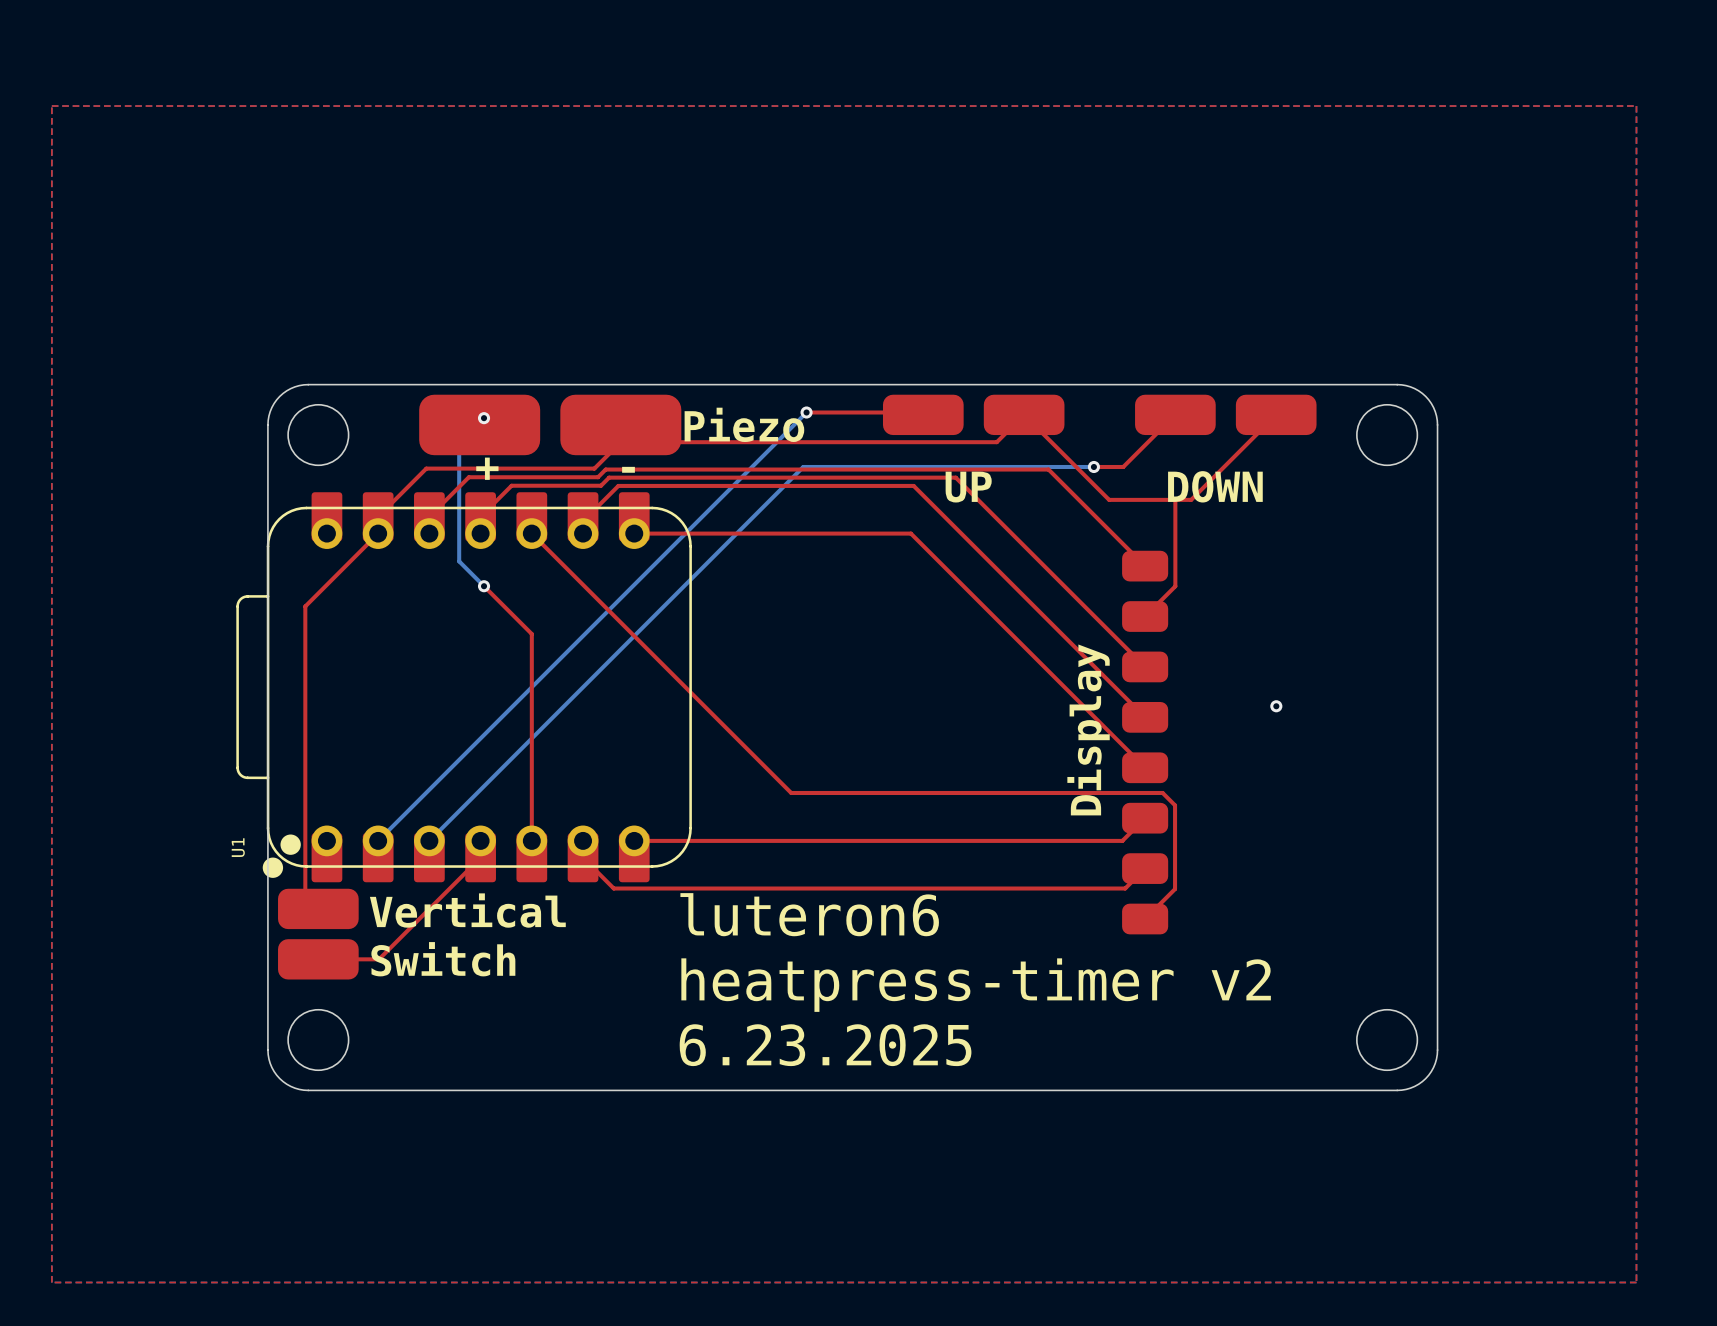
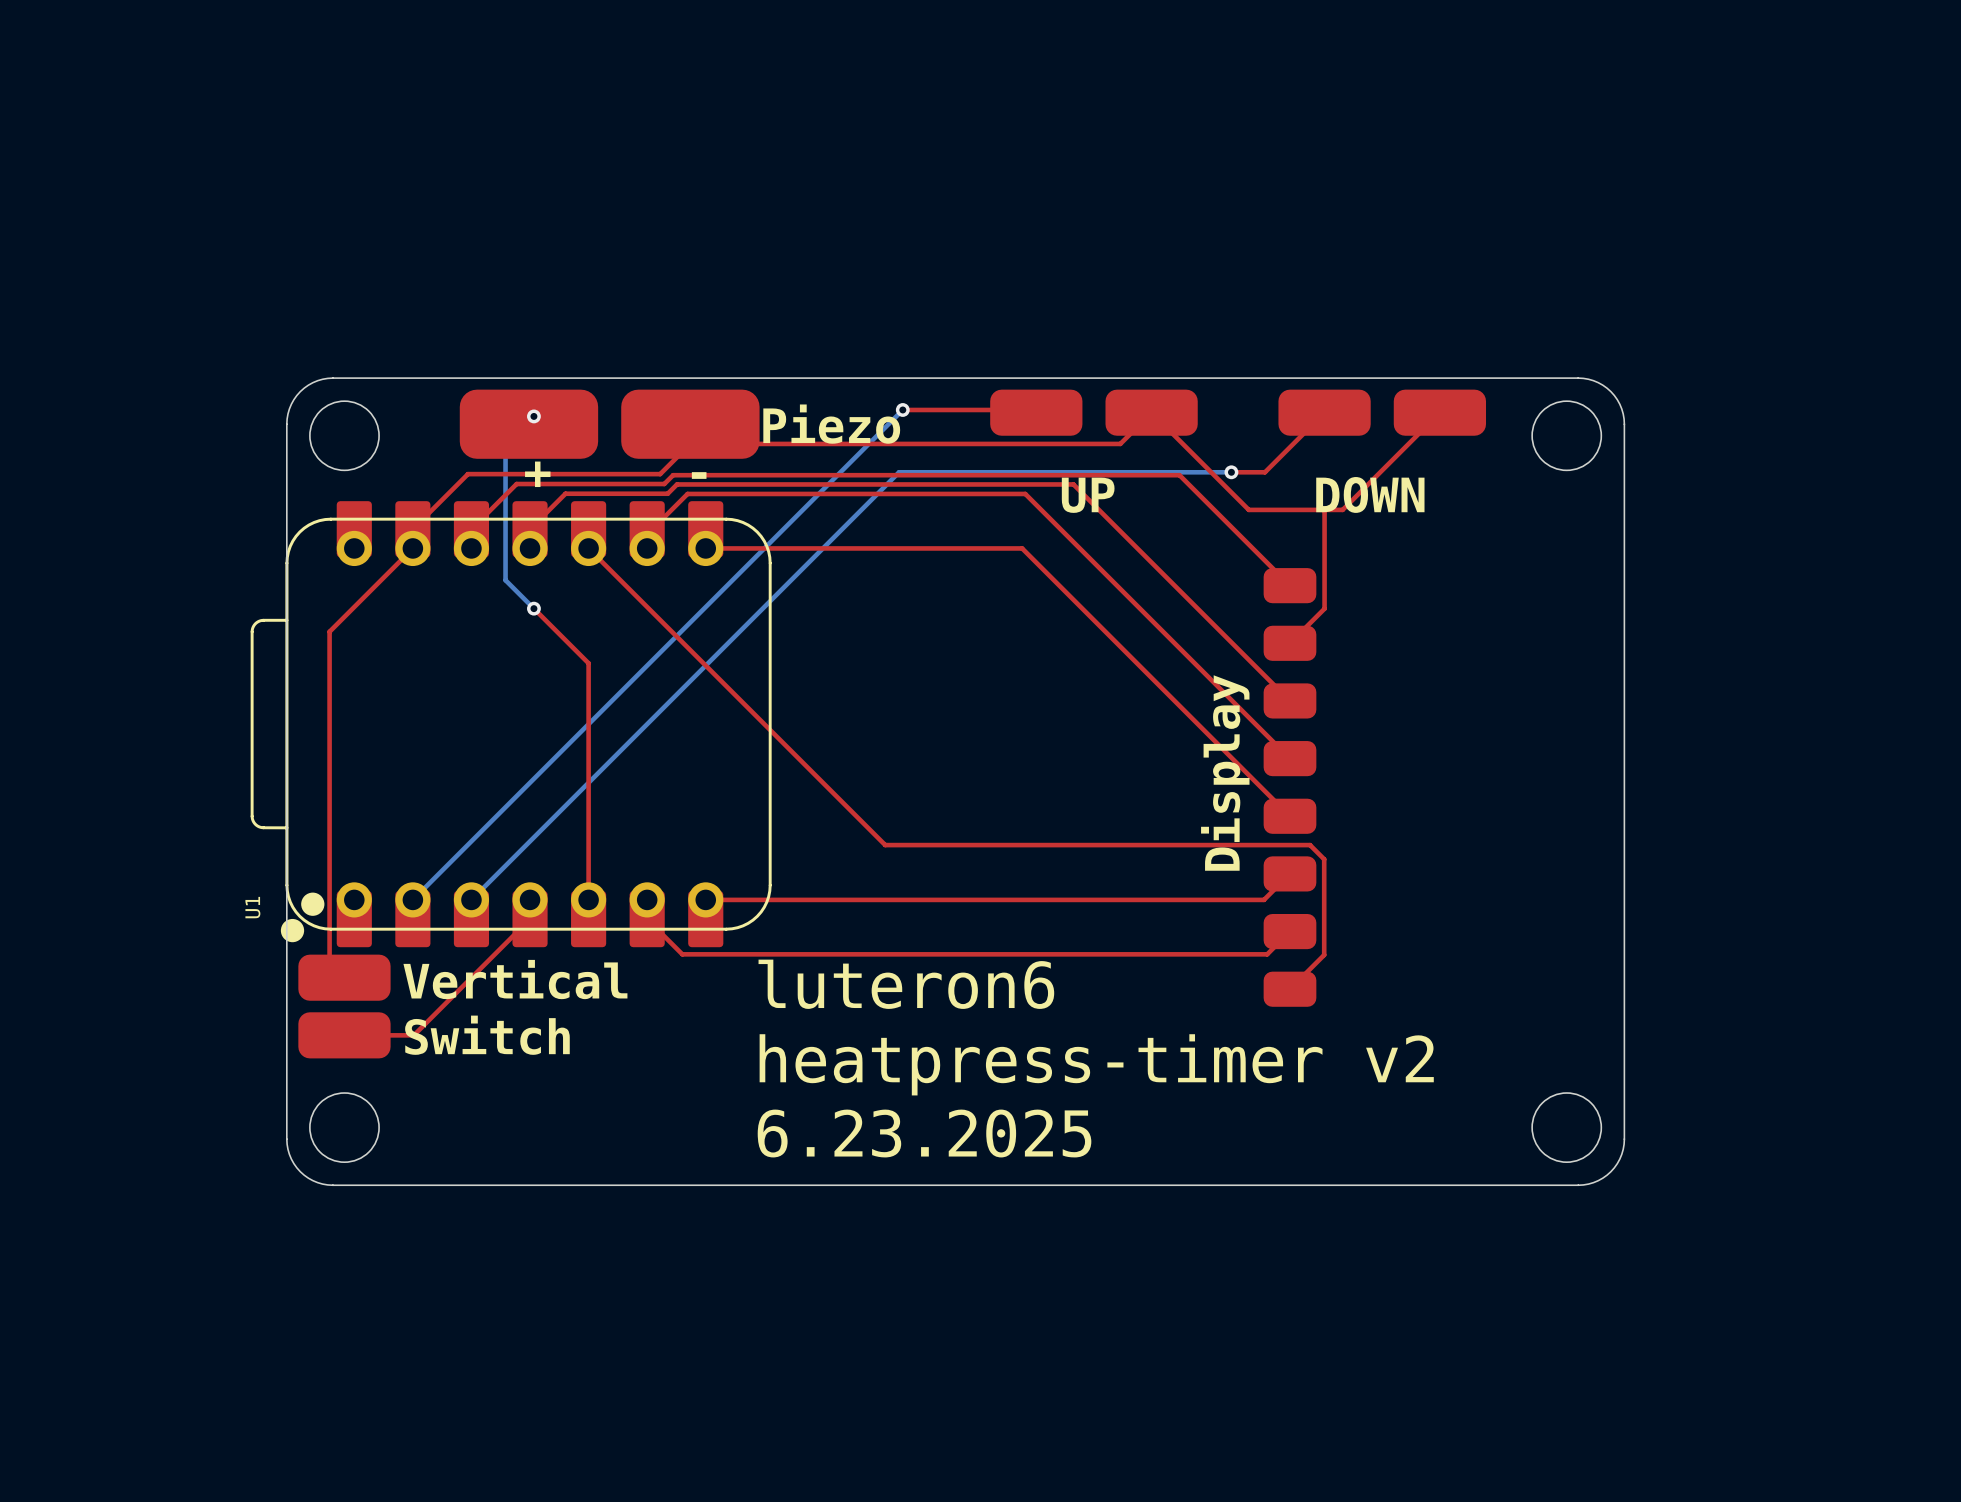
top zone outline: (51, 106) (1636, 106) (1636, 1282) (51, 1282) (51, 106) -> none
via: (1276, 706) -> none

